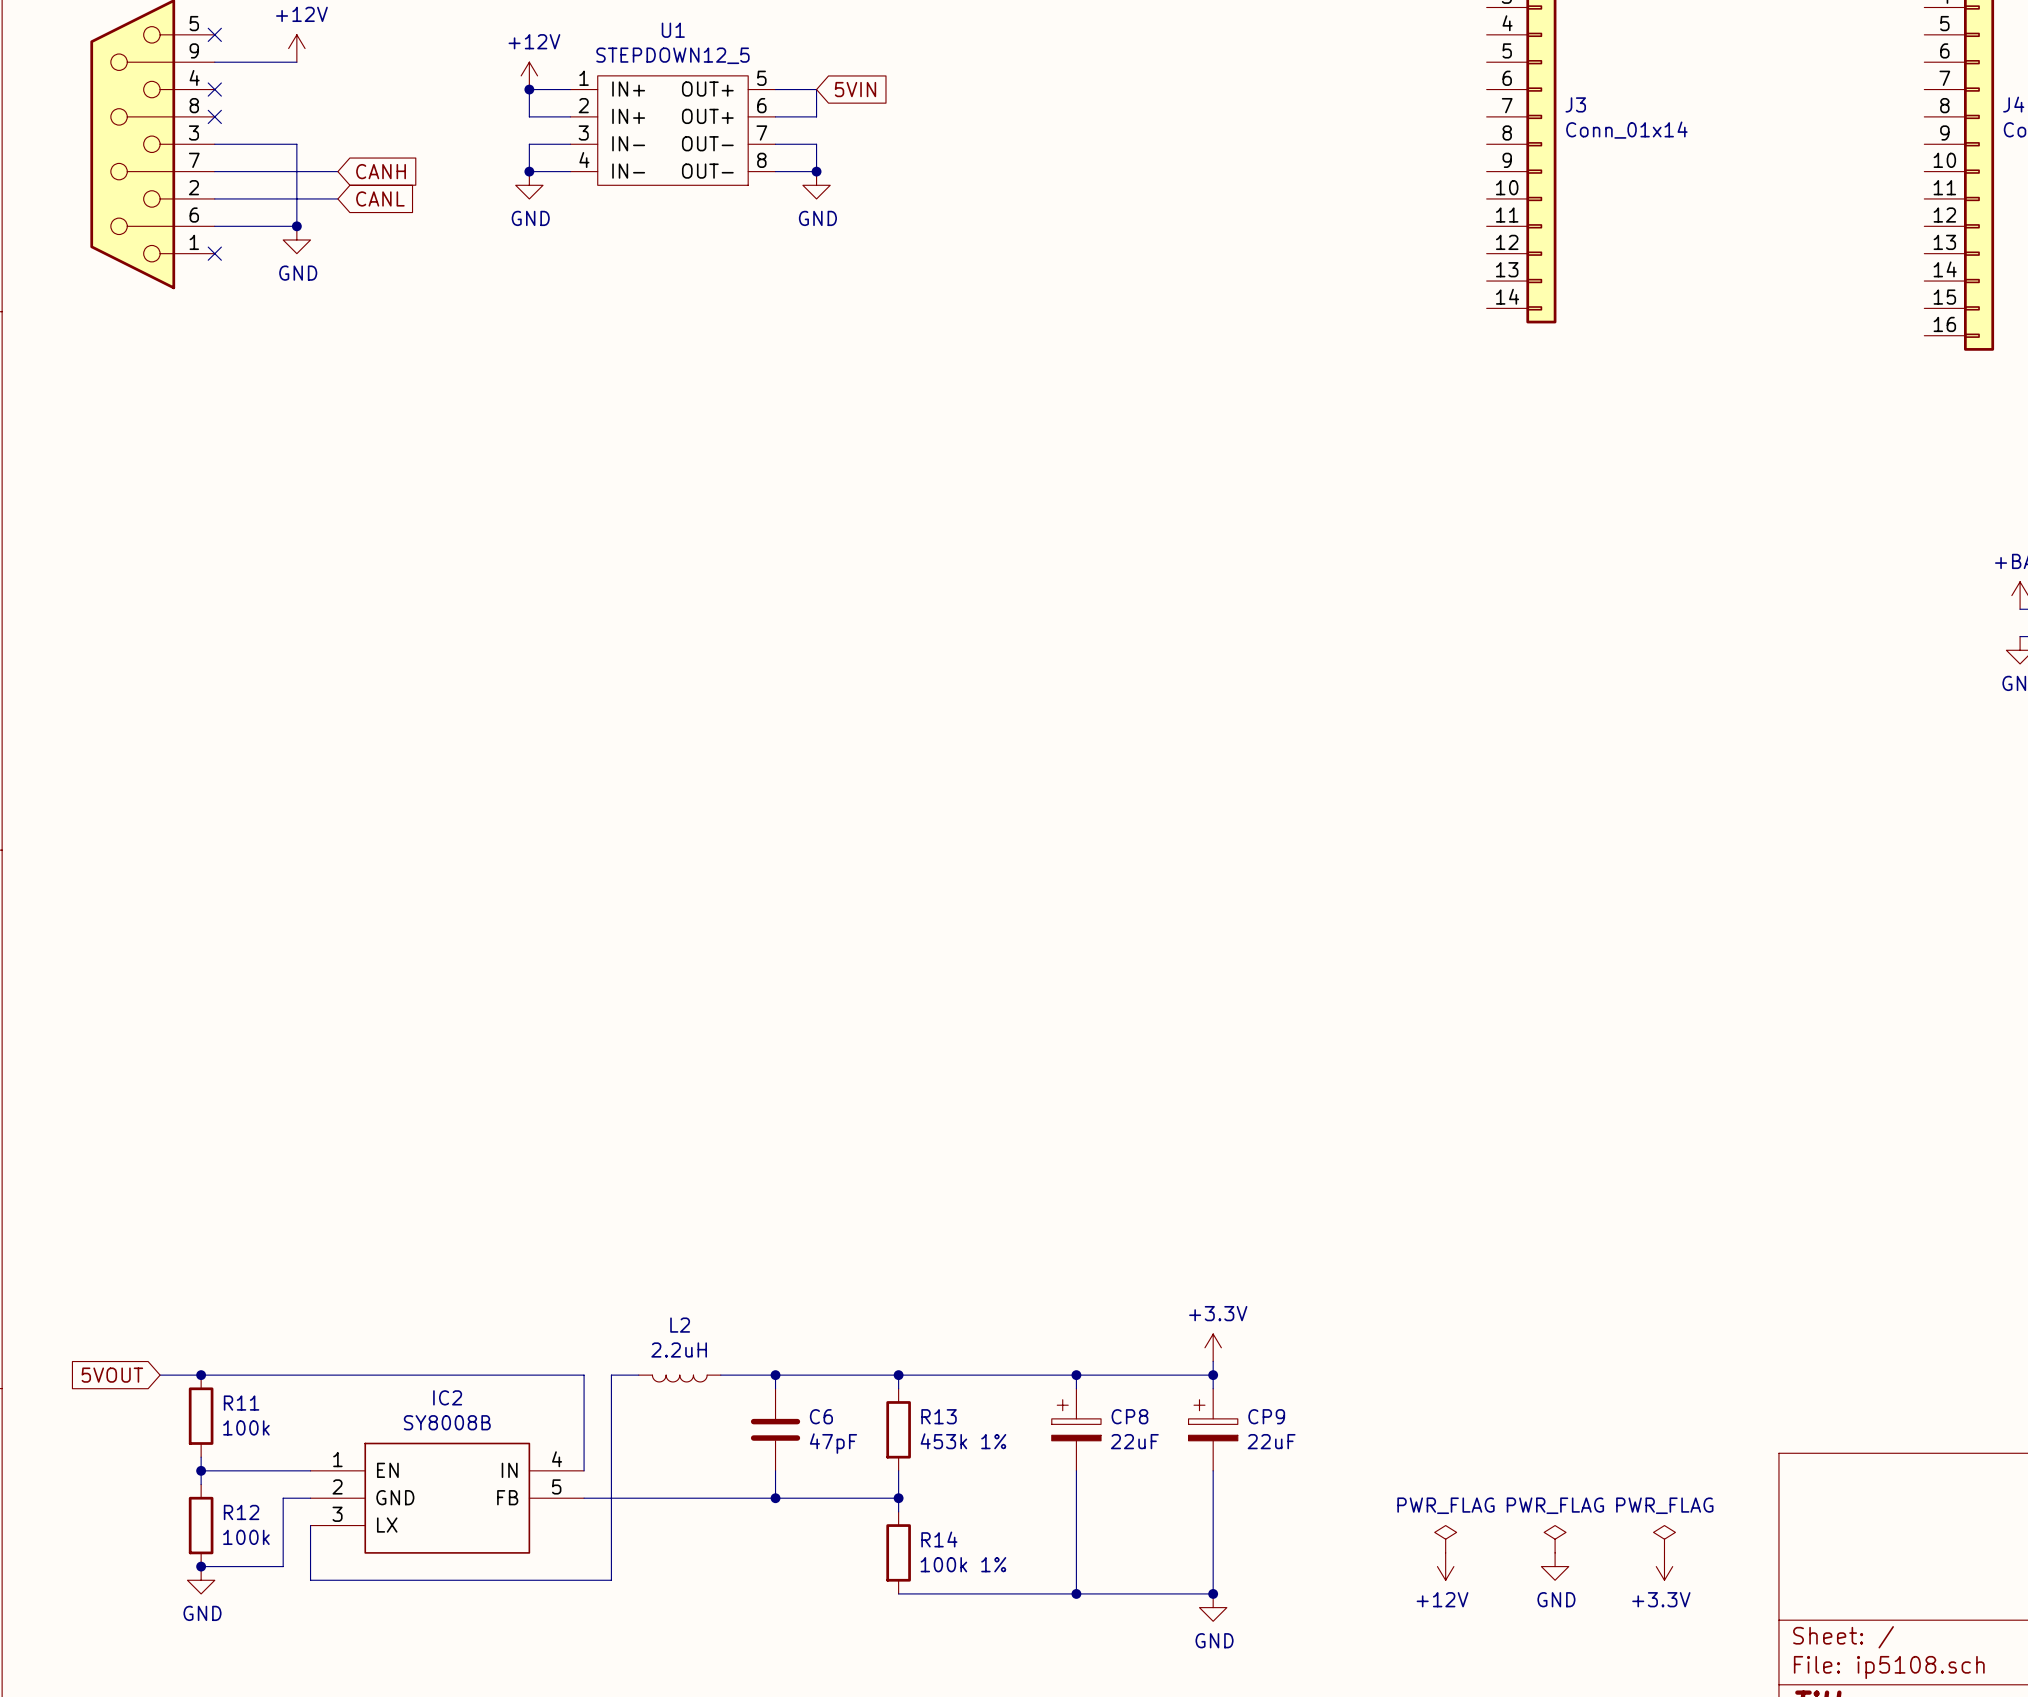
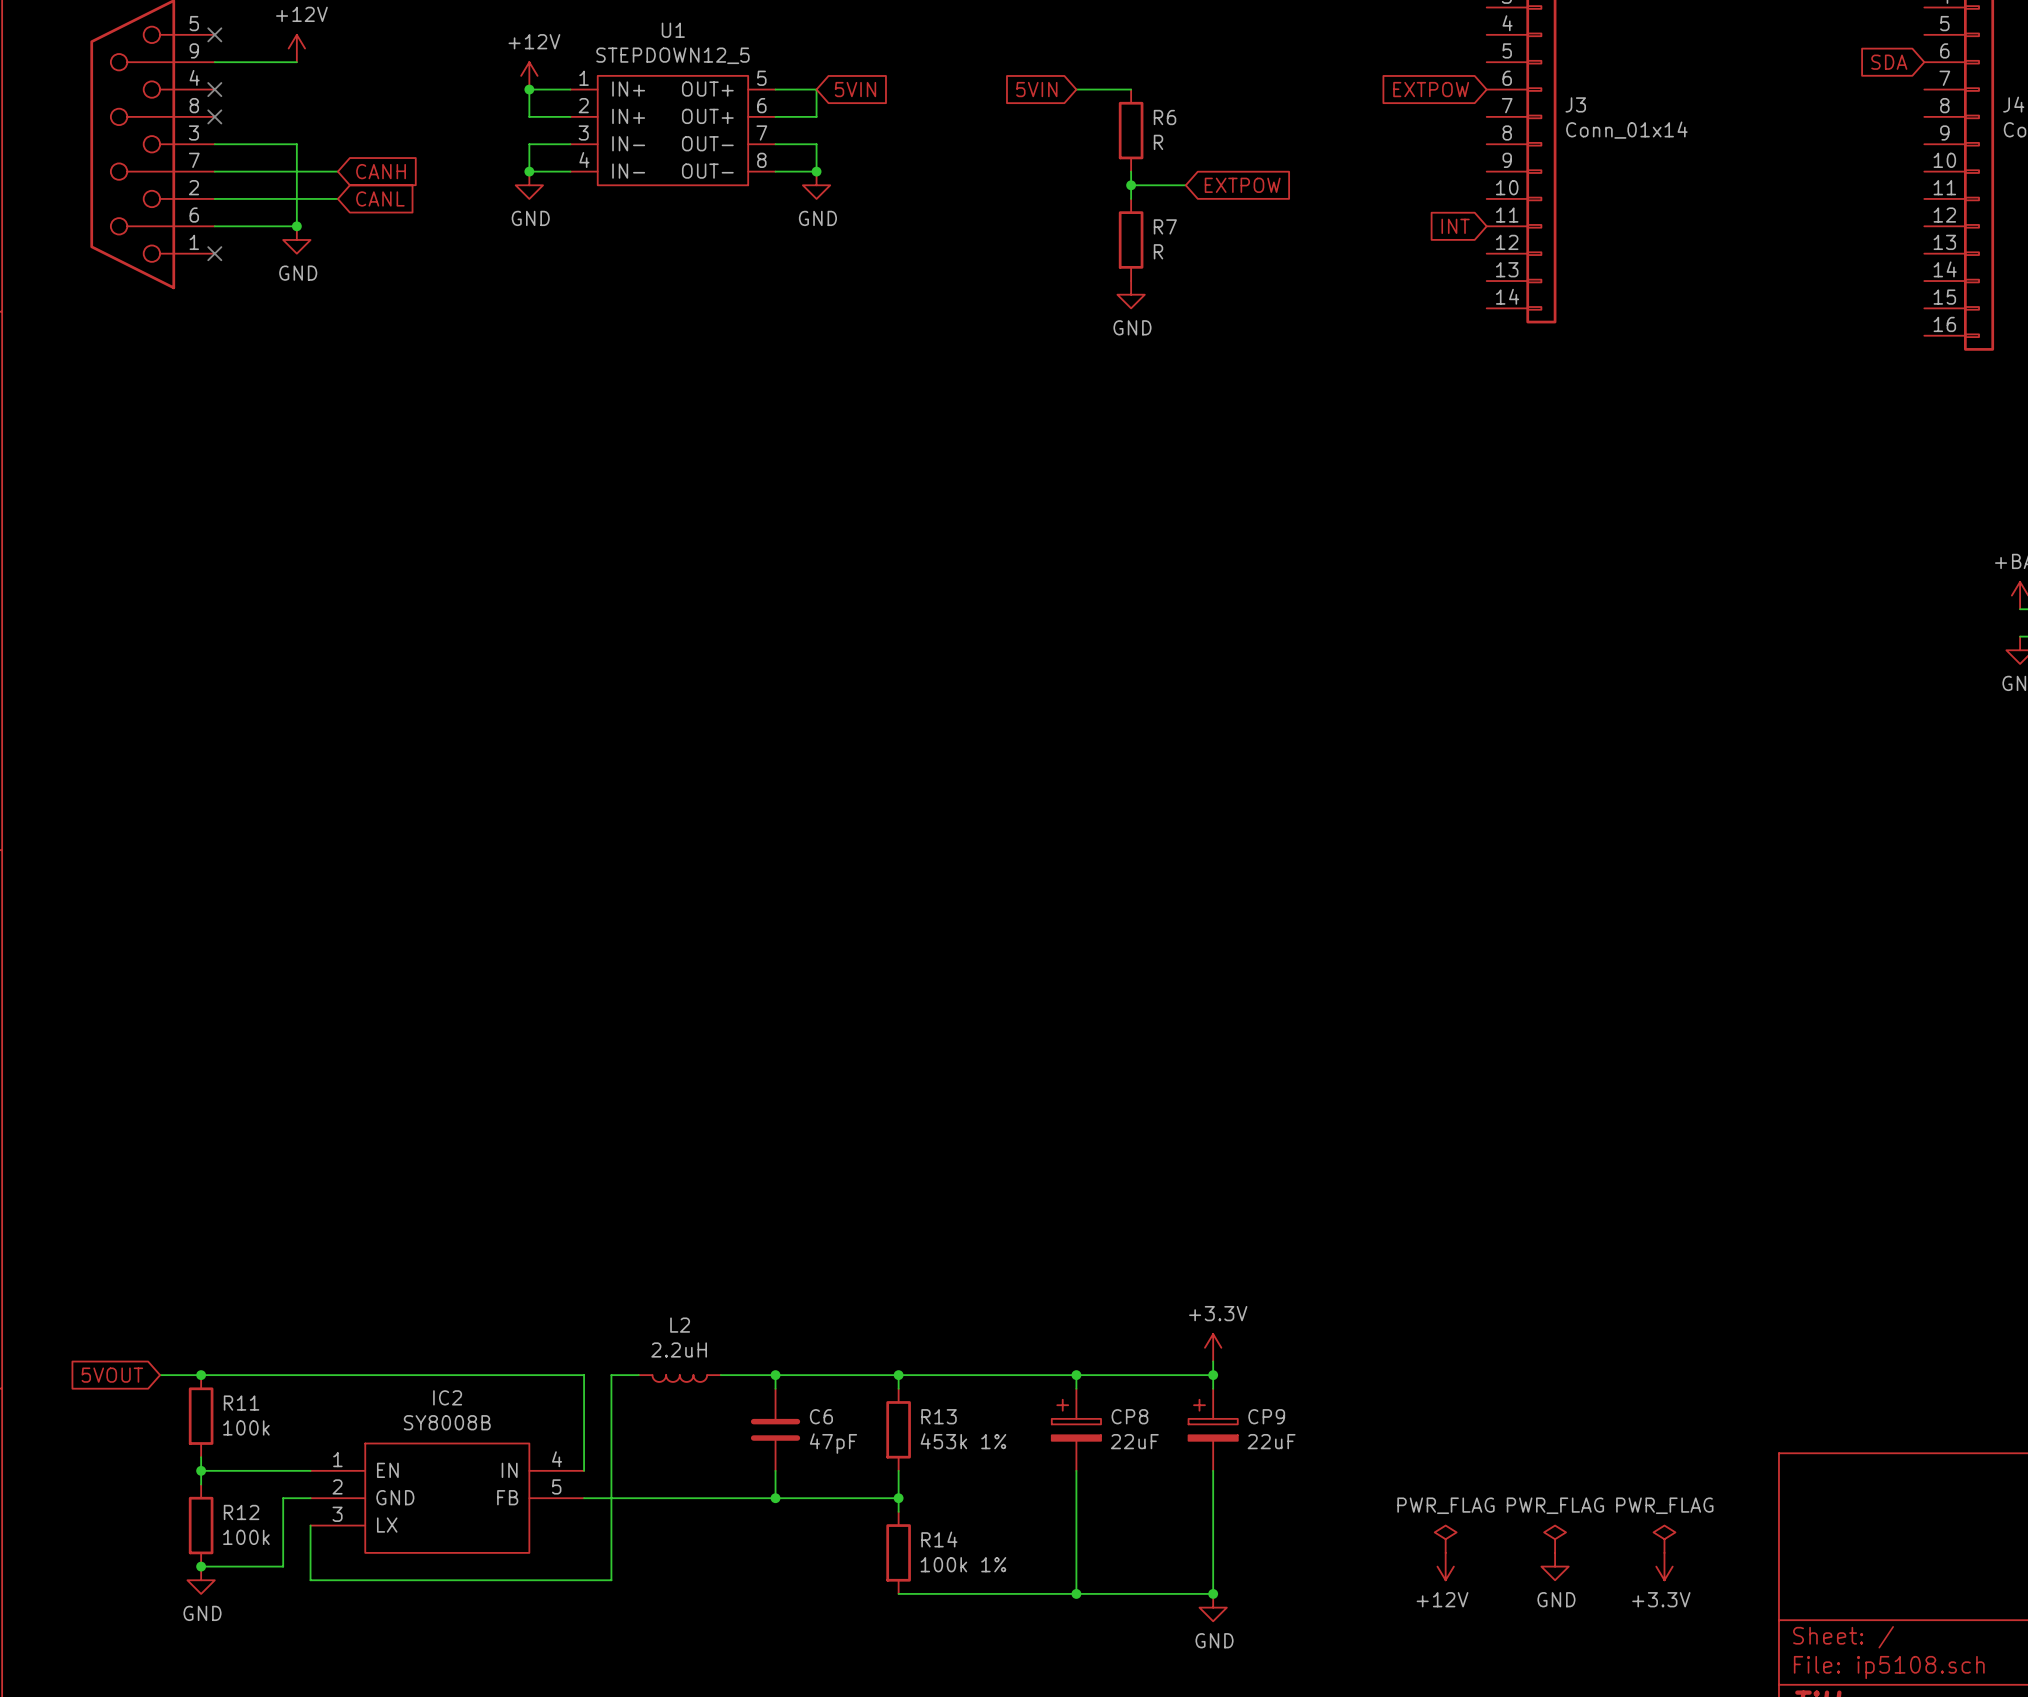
global label: none -> SDA (1889, 62)
global label: none -> 5VIN (1036, 89)
wire: none -> (1076, 89) (1131, 89)
global label: none -> EXTPOW (1431, 89)
R6: none -> R (1131, 130)
wire: none -> (1131, 171) (1131, 198)
wire: none -> (1131, 185) (1185, 185)
junction: none -> (1131, 185)
global label: none -> EXTPOW (1242, 185)
global label: none -> INT (1455, 226)
R7: none -> R (1131, 239)
power symbol: none -> GND (1131, 294)

